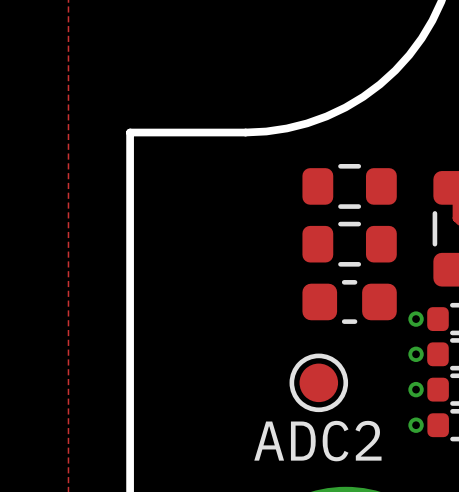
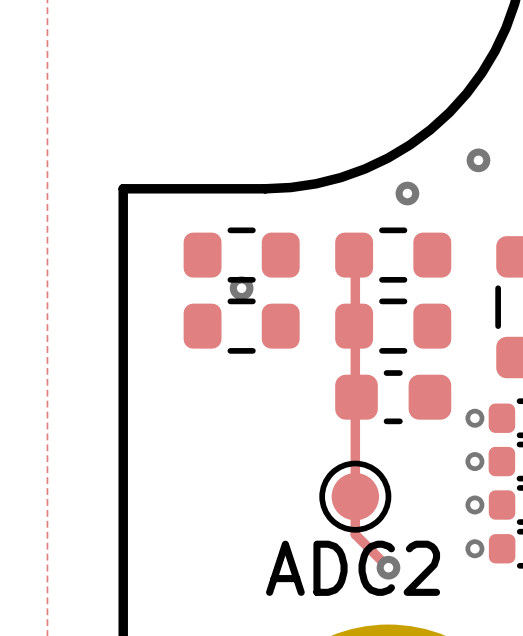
via: none -> (478, 160)
via: none -> (407, 193)
part: none -> (241, 255)
track: none -> (354, 255) (355, 534) (388, 567)
via: none -> (241, 288)
part: none -> (241, 326)
via: none -> (388, 567)

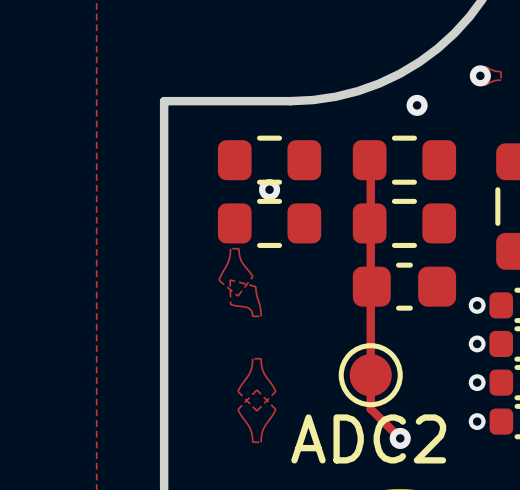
zone outline: none -> (484, 66) (501, 71) (501, 80) (484, 85) (475, 75) (484, 66)
zone outline: none -> (230, 248) (228, 260) (218, 280) (237, 296) (252, 276) (241, 261) (238, 248) (230, 248)
zone outline: none -> (230, 279) (255, 286) (261, 316) (252, 316) (251, 310) (247, 307) (230, 304) (230, 279)
zone outline: none -> (252, 358) (250, 371) (237, 391) (256, 411) (275, 391) (263, 371) (261, 358) (252, 358)
zone outline: none -> (256, 389) (275, 409) (263, 429) (261, 442) (252, 442) (250, 429) (237, 409) (256, 389)

